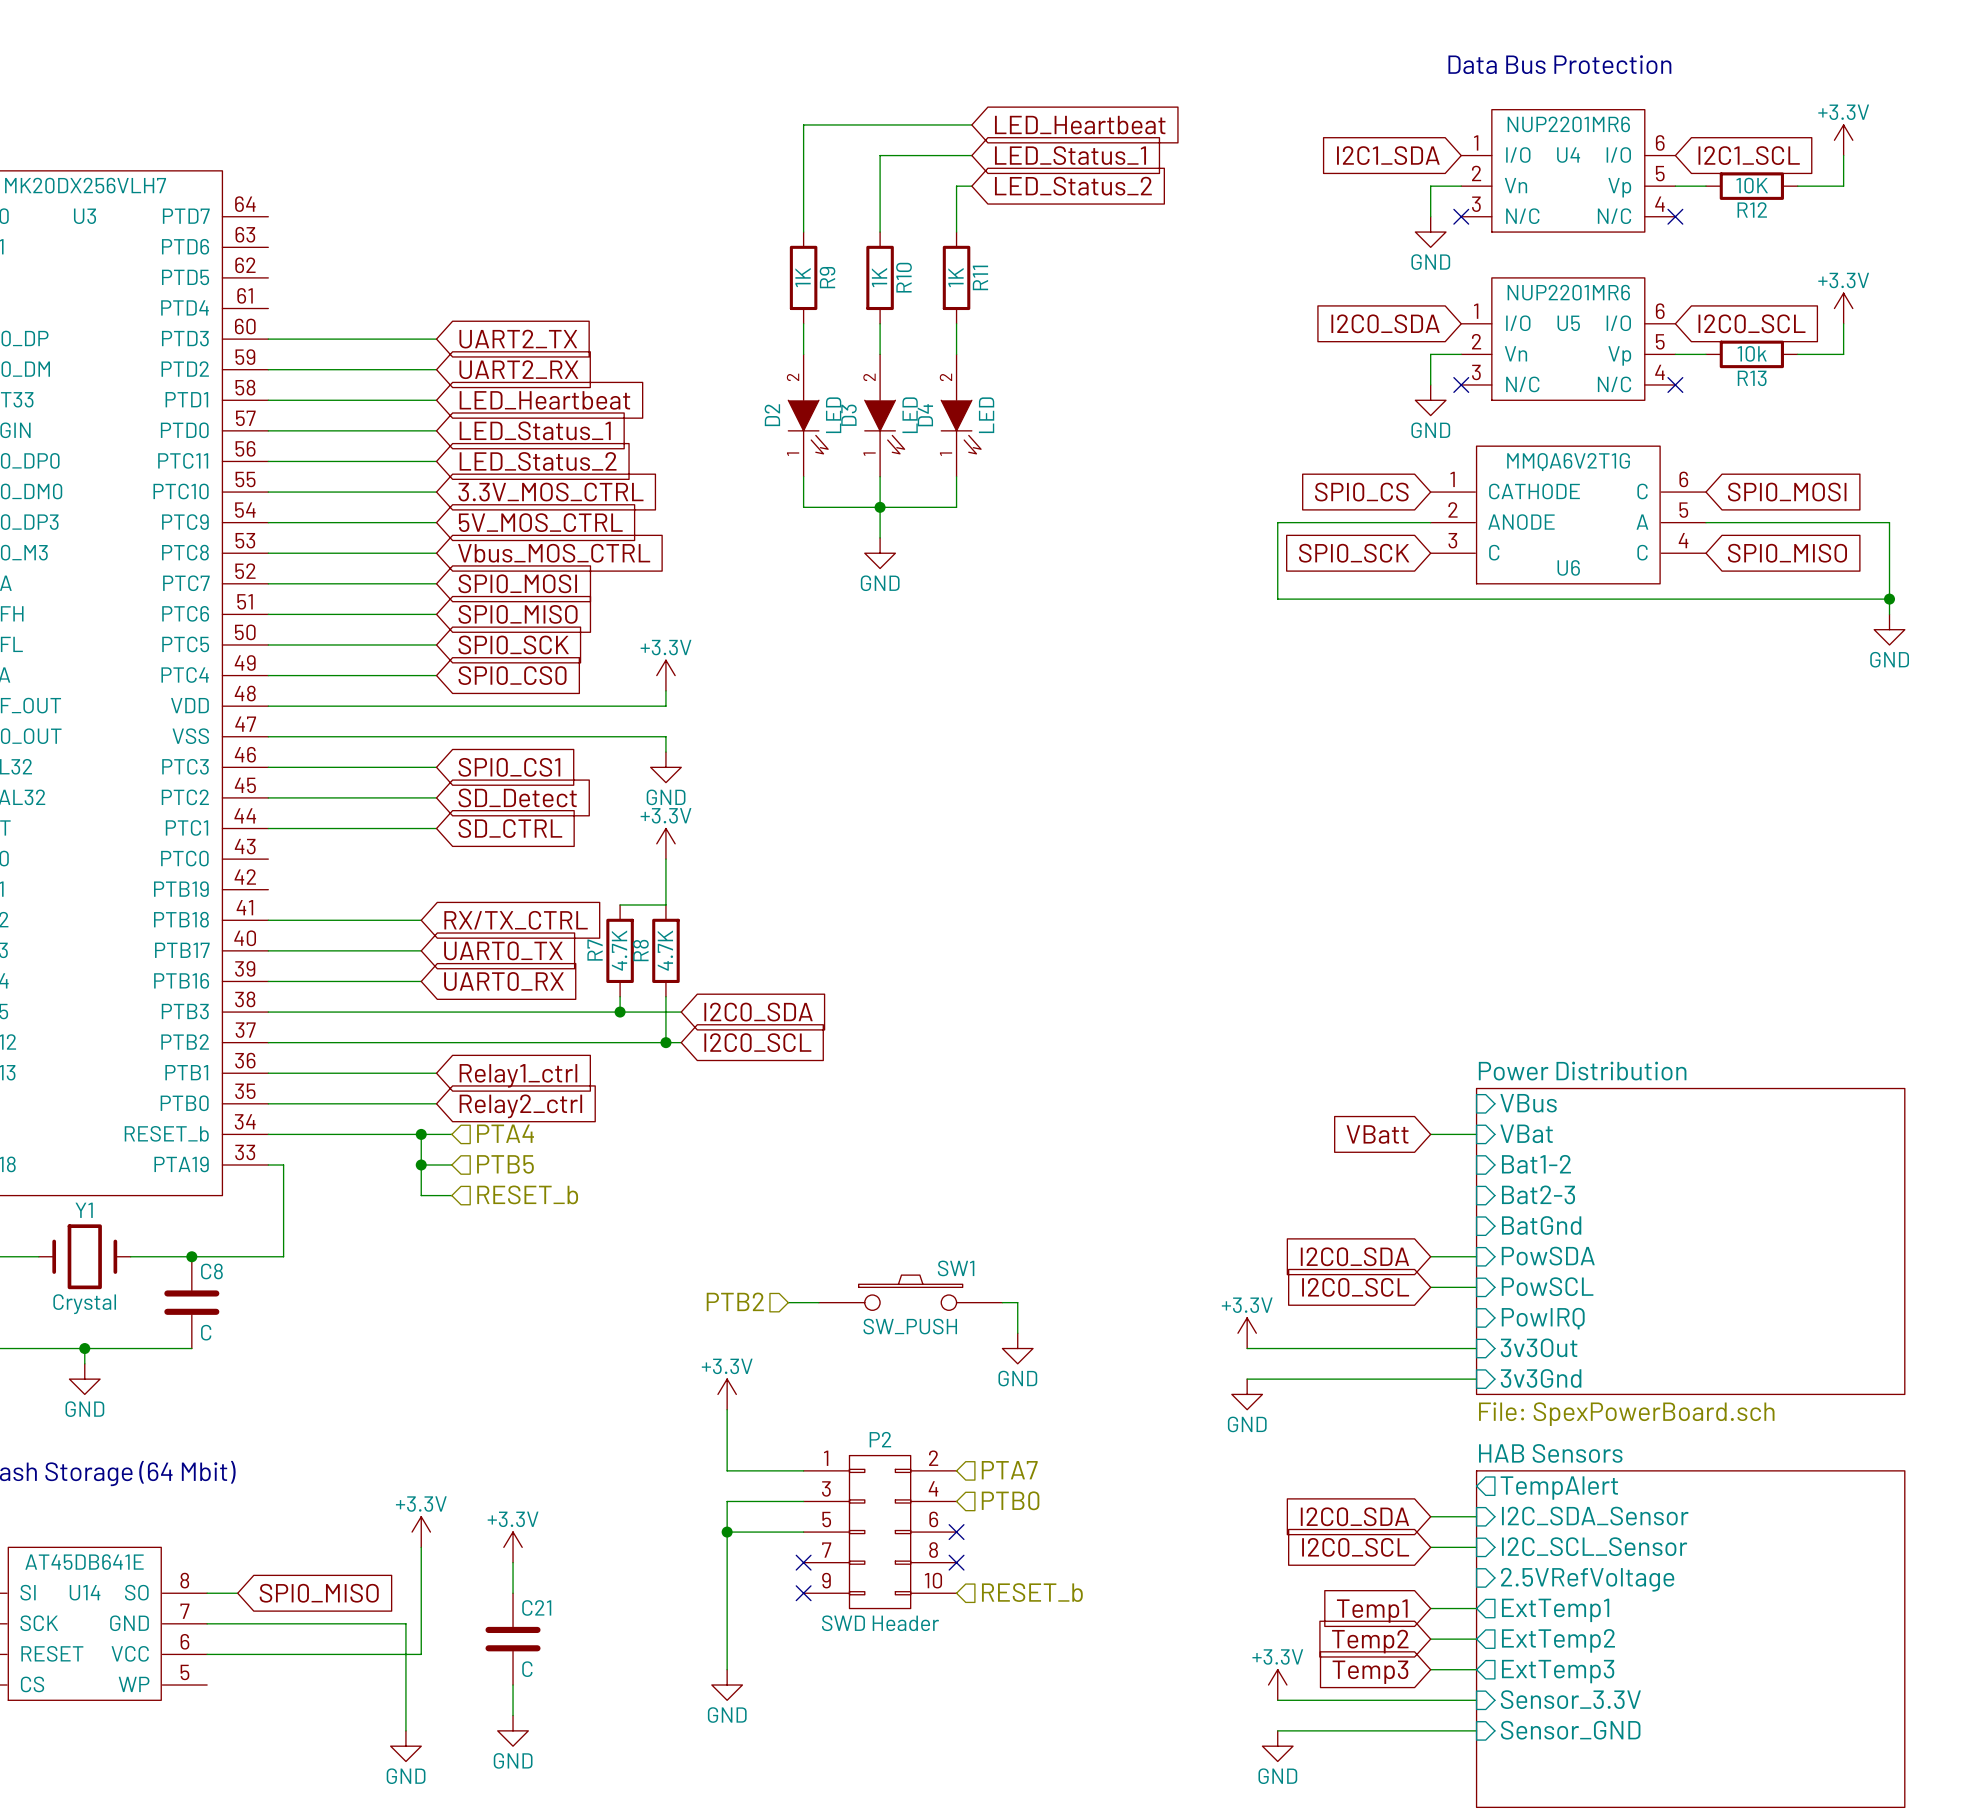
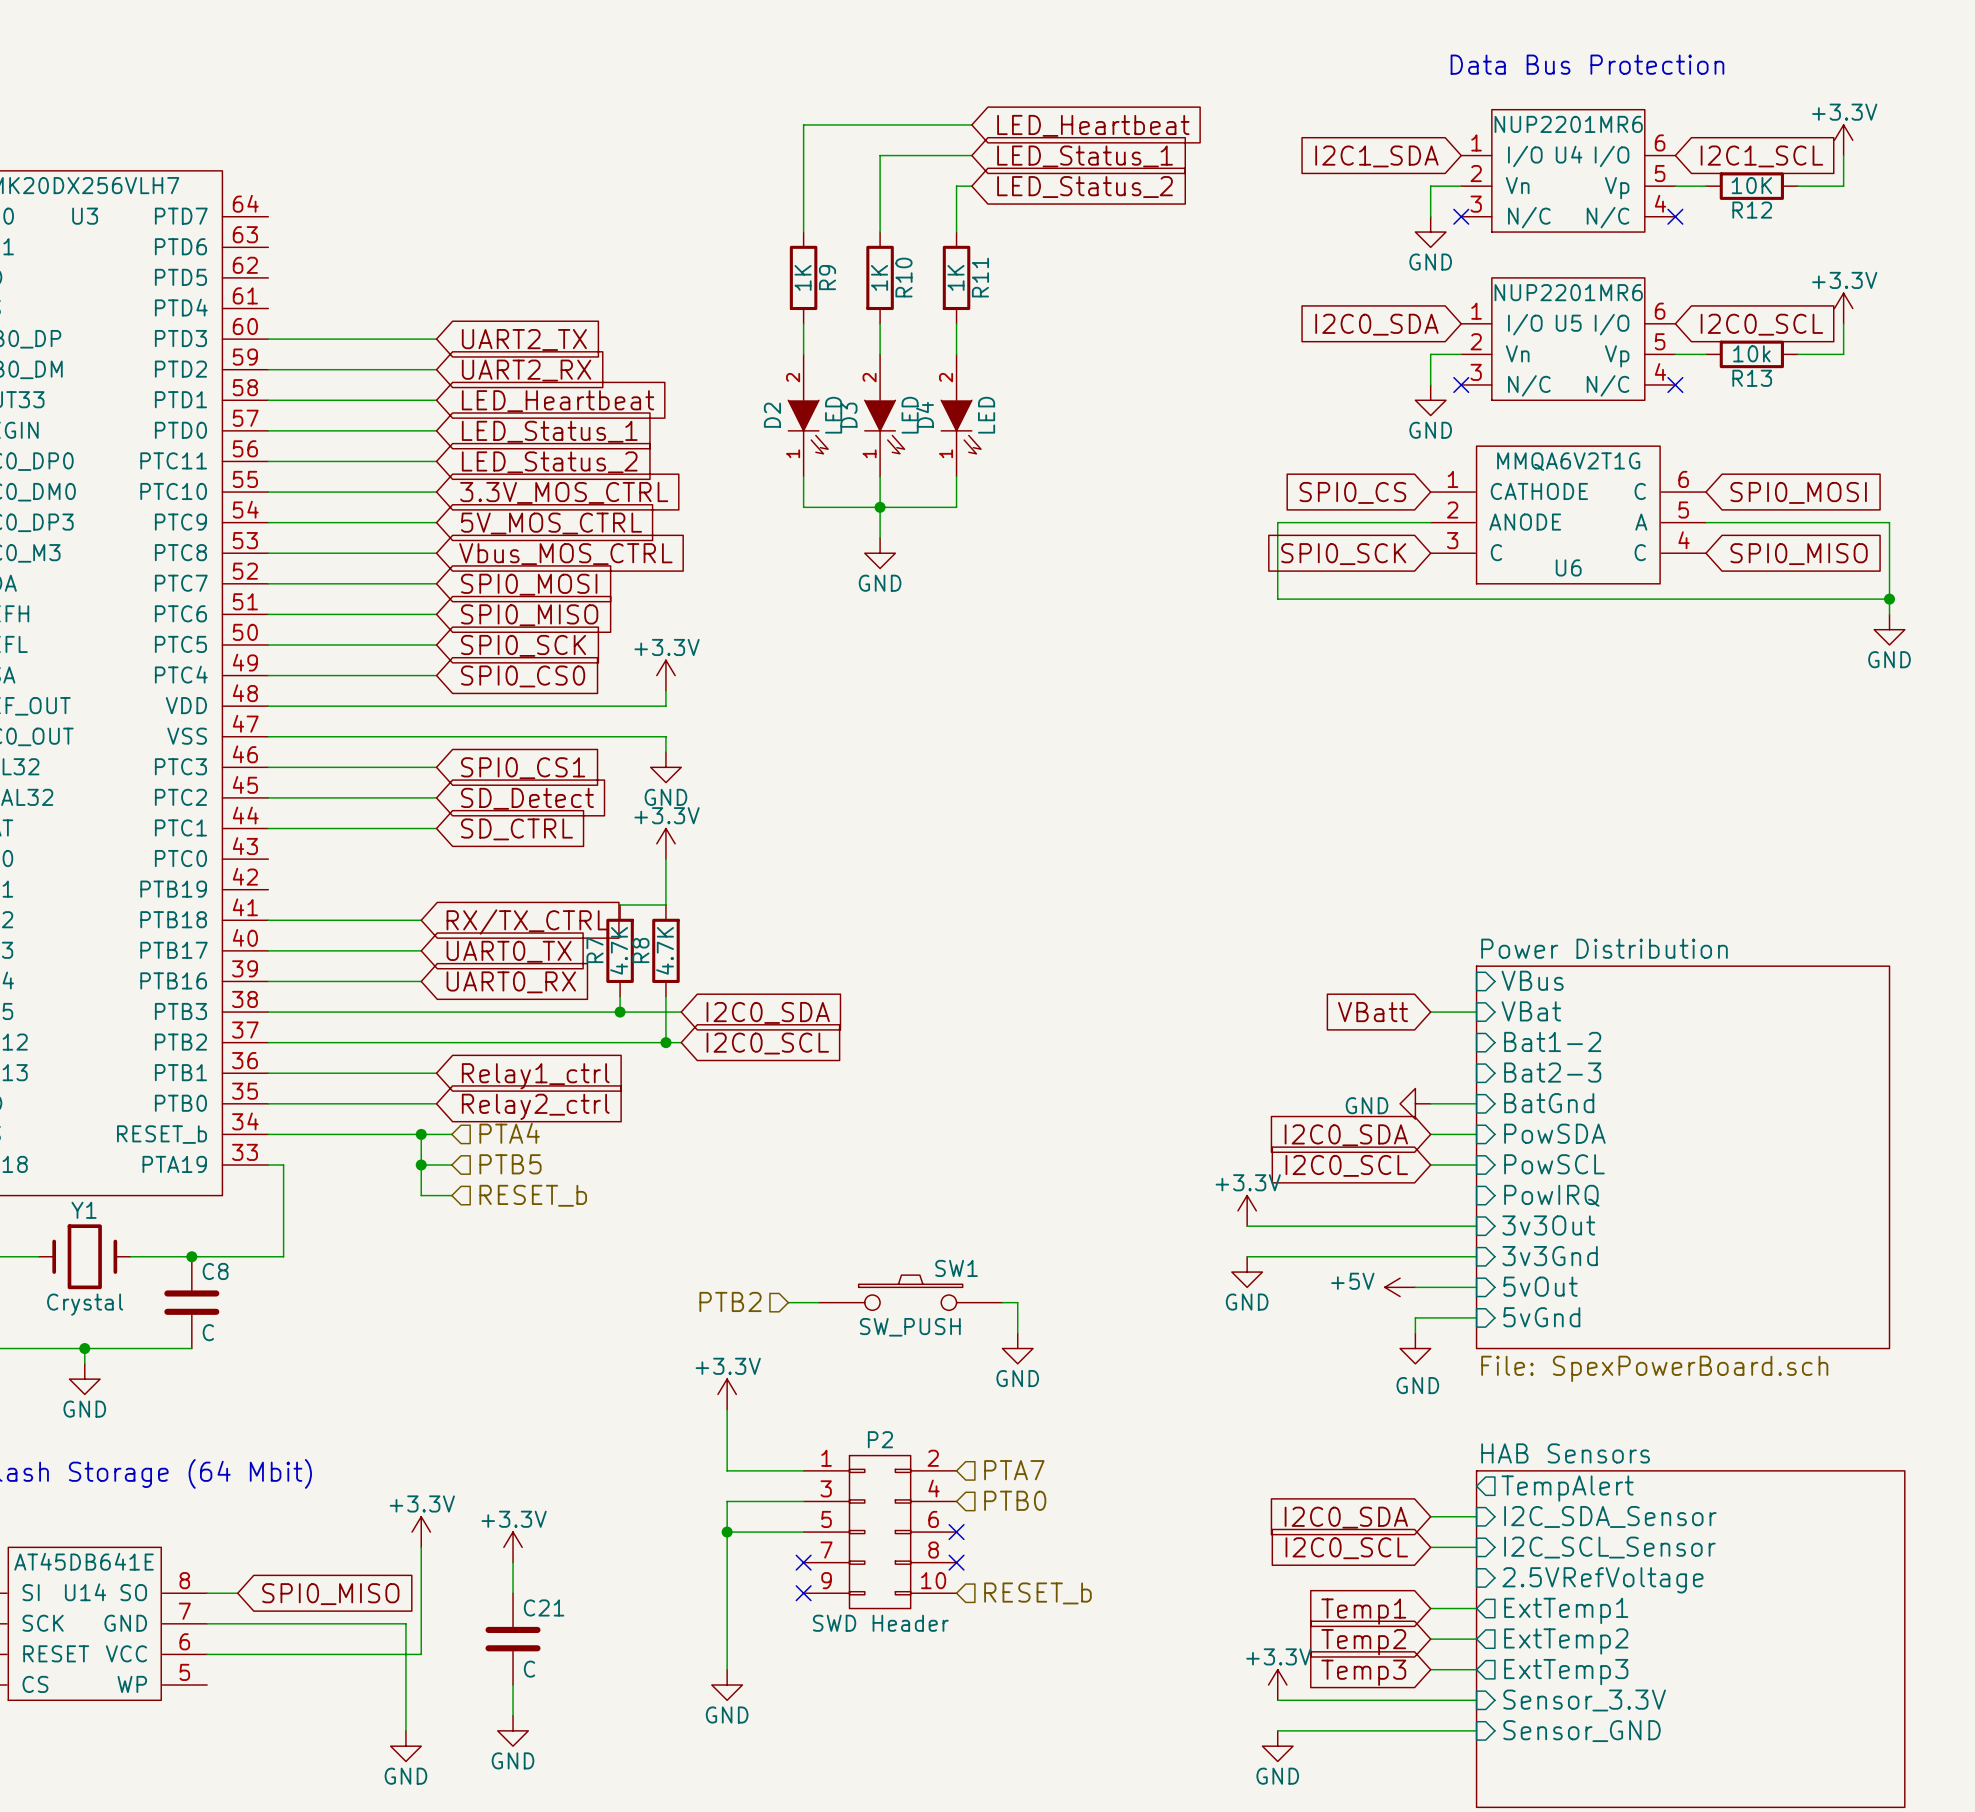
sheet pin: none -> VBus (1532, 980)
sheet pin: none -> VBat (1531, 1011)
global label: none -> VBatt (1372, 1012)
wire: none -> (1430, 1012) (1476, 1012)
sheet pin: none -> Bat1-2 (1552, 1041)
sheet pin: none -> Bat2-3 (1552, 1072)
power symbol: none -> GND (1415, 1103)
wire: none -> (1430, 1103) (1476, 1103)
sheet pin: VBus (1528, 1103) -> BatGnd (1549, 1103)
sheet pin: VBat (1526, 1133) -> PowSDA (1554, 1133)
global label: VBatt (1377, 1134) -> I2C0_SDA (1346, 1135)
sheet Power Distribution: none -> File: SpexPowerBoard.sch (1683, 1157)
wire: none -> (1430, 1164) (1476, 1164)
sheet pin: Bat1-2 (1536, 1164) -> PowSCL (1554, 1164)
sheet pin: Bat2-3 (1538, 1194) -> PowIRQ (1551, 1195)
sheet pin: BatGnd (1541, 1225) -> 3v3Out (1548, 1225)
sheet Power Distribution: File: SpexPowerBoard.sch (1690, 1241) -> none
wire: none -> (1247, 1256) (1430, 1256)
global label: I2C0_SDA (1354, 1256) -> none
sheet pin: PowSDA (1548, 1256) -> 3v3Gnd (1550, 1256)
power symbol: none -> GND (1247, 1272)
sheet pin: PowSCL (1547, 1286) -> 5vOut (1540, 1286)
global label position: I2C0_SCL (1355, 1287) -> I2C0_SCL (1346, 1165)
power symbol: none -> +5V (1400, 1287)
wire: none -> (1415, 1287) (1430, 1287)
wire: none -> (1476, 1317) (1415, 1317) (1415, 1333)
sheet pin: PowIRQ (1543, 1318) -> 5vGnd (1541, 1317)
power symbol position: +3.3V (1247, 1333) -> +3.3V (1247, 1210)
sheet pin: 3v3Out (1539, 1347) -> none
wire: (1247, 1348) (1476, 1348) -> (1247, 1226) (1476, 1226)
power symbol: none -> GND (1415, 1348)
sheet pin: 3v3Gnd (1541, 1378) -> none
wire: (1247, 1379) (1476, 1379) -> none
power symbol: GND (1247, 1394) -> none

